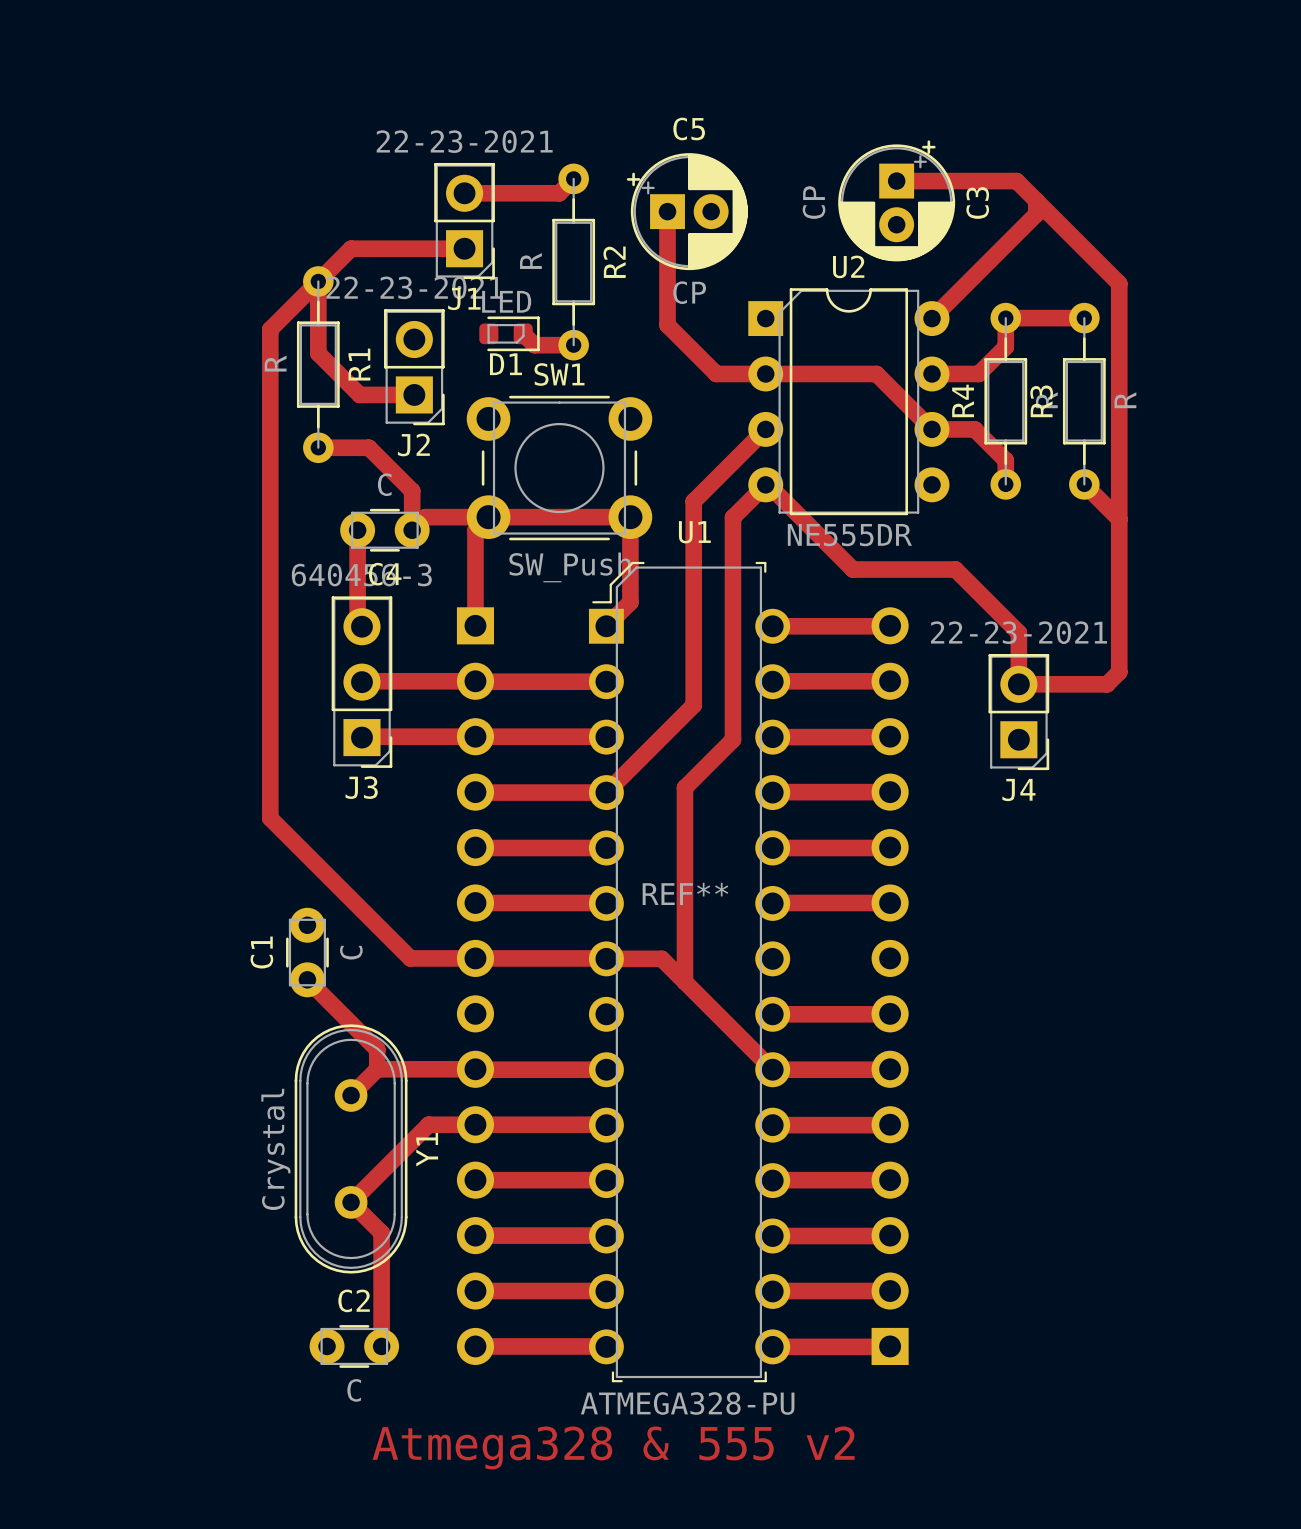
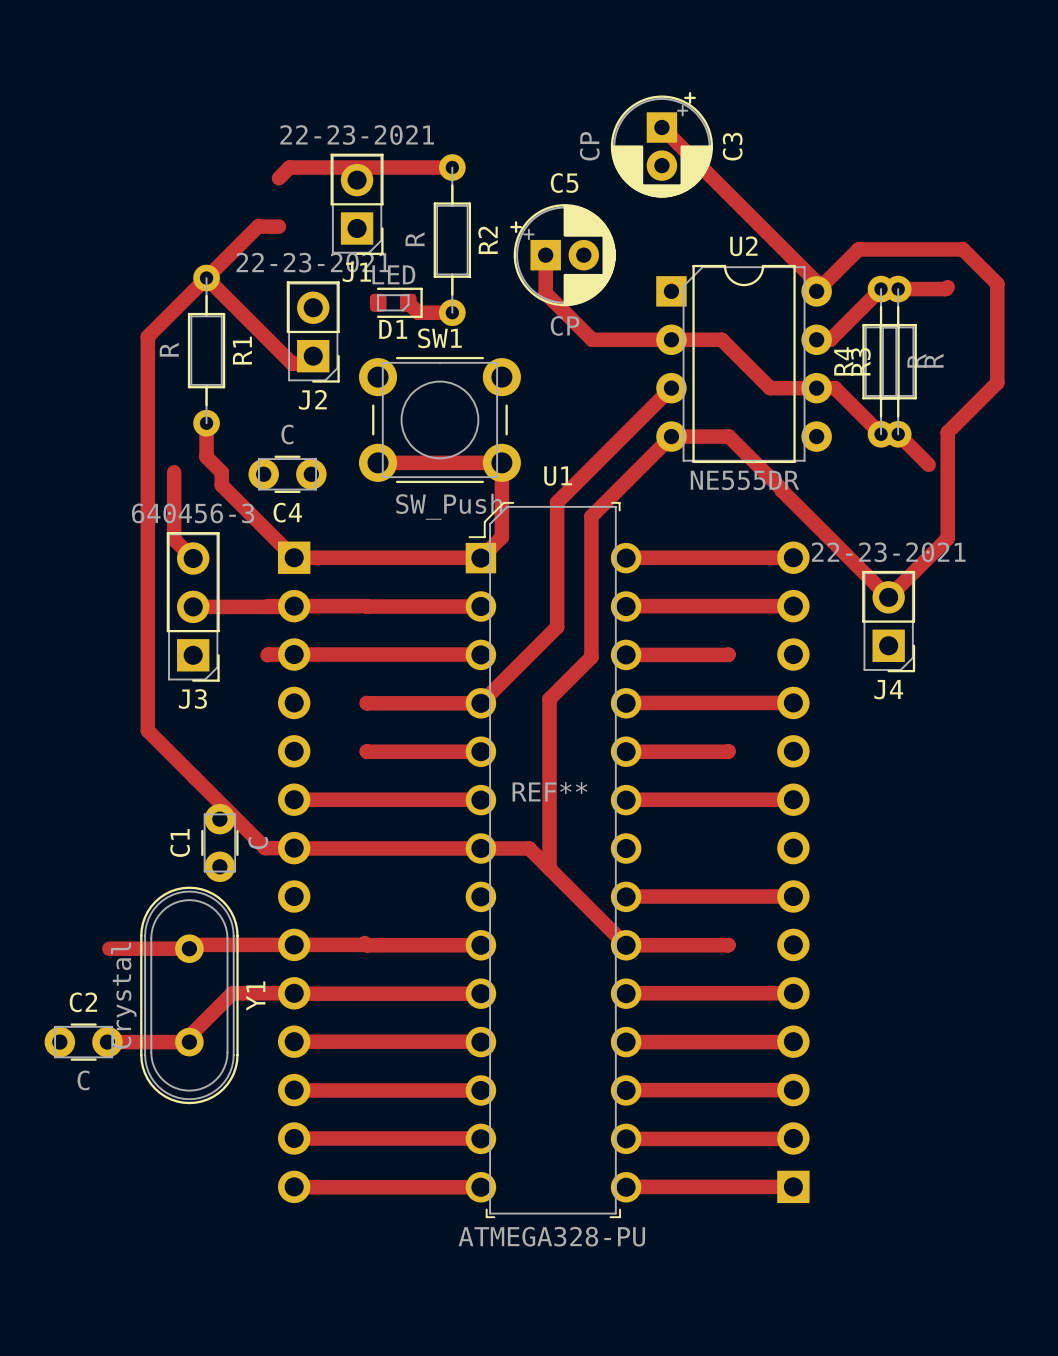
top track: (573, 178) (559, 193) (464, 193) -> (452, 167) (289, 167) (278, 178)
top track: (896, 181) (1016, 181) (1119, 283) (1119, 672) (1107, 684) (1018, 684) (1018, 632) (955, 569) (853, 569) (768, 484) (765, 484) (732, 517) (732, 578) -> (661, 127) (816, 282) (816, 291) (858, 249) (962, 249) (997, 283) (997, 382) (947, 432) (947, 538) (888, 597) (728, 436) (671, 436) (591, 516)
C3 position: (896, 200) -> (661, 144)
top track: (1036, 200) (1036, 214) (932, 318) -> none
top track: (667, 211) (667, 325) (716, 373) (876, 373) (932, 429) (974, 429) (1005, 460) (1005, 484) -> none
C5 position: (687, 211) -> (562, 255)
top track: (464, 248) (351, 248) (270, 329) (270, 818) (410, 958) (606, 958) -> (278, 226) (257, 226) (147, 336) (147, 730) (265, 848) (480, 848)
top track: none -> (545, 255) (545, 293) (592, 339) (721, 339) (770, 388) (834, 388) (881, 434)
top track: (318, 281) (318, 353) (359, 394) (414, 394) -> none
top track: none -> (206, 278) (292, 363) (307, 363)
top track: none -> (947, 287) (945, 289) (898, 289)
top track: (1064, 318) (1005, 318) (1005, 346) (978, 373) (932, 373) -> (881, 289) (830, 339) (816, 339)
R1 position: (318, 364) -> (206, 350)
U2 position: (848, 401) -> (744, 363)
R4 position: (1005, 401) -> (881, 361)
top track: (765, 429) (693, 501) (693, 562) -> (671, 388) (557, 502)
top track: (318, 447) (368, 447) (412, 490) (412, 530) (425, 517) (488, 517) (475, 530) (475, 625) -> none
top track: none -> (206, 423) (206, 457) (221, 472) (221, 485) (294, 557) (480, 557)
top track: none -> (174, 472) (174, 539) (193, 558)
top track: (357, 530) (357, 622) (361, 626) -> none
top track: (890, 625) (772, 626) -> (793, 557) (626, 557)
top track: none -> (294, 606) (193, 606)
top track: none -> (728, 606) (793, 606)
J3 position: (361, 682) -> (193, 606)
J4 position: (1018, 712) -> (888, 621)
top track: none -> (728, 702) (793, 702)
top track: none -> (294, 799) (366, 799)
top track: none -> (728, 799) (793, 799)
top track: (307, 979) (377, 1049) (377, 1069) (351, 1095) -> none
part position: (475, 986) -> (294, 872)
part position: (890, 986) -> (793, 872)
top track: (890, 1013) (772, 1014) -> (793, 896) (626, 896)
top track: none -> (280, 944) (193, 944) (189, 948) (109, 948)
top track: (890, 1124) (772, 1125) -> (793, 993) (626, 993)
top track: (606, 1125) (428, 1124) (351, 1202) (381, 1232) (381, 1346) -> (480, 993) (232, 993) (189, 1036) (189, 1042) (107, 1042)
Y1 position: (351, 1148) -> (189, 995)
top track: none -> (294, 1041) (366, 1041)
top track: (890, 1180) (772, 1180) -> (793, 1041) (626, 1042)
top track: (475, 1235) (606, 1236) -> (294, 1090) (480, 1090)
top track: (890, 1235) (772, 1236) -> (793, 1090) (626, 1090)
top track: none -> (294, 1138) (366, 1138)
top track: (890, 1291) (772, 1291) -> (793, 1138) (626, 1138)
C2 position: (354, 1346) -> (83, 1042)
top track: (475, 1346) (606, 1346) -> (294, 1186) (480, 1187)
top track: (890, 1346) (772, 1346) -> (793, 1186) (626, 1186)
text: Atmega328 & 555 v2 (613, 1447) -> none

